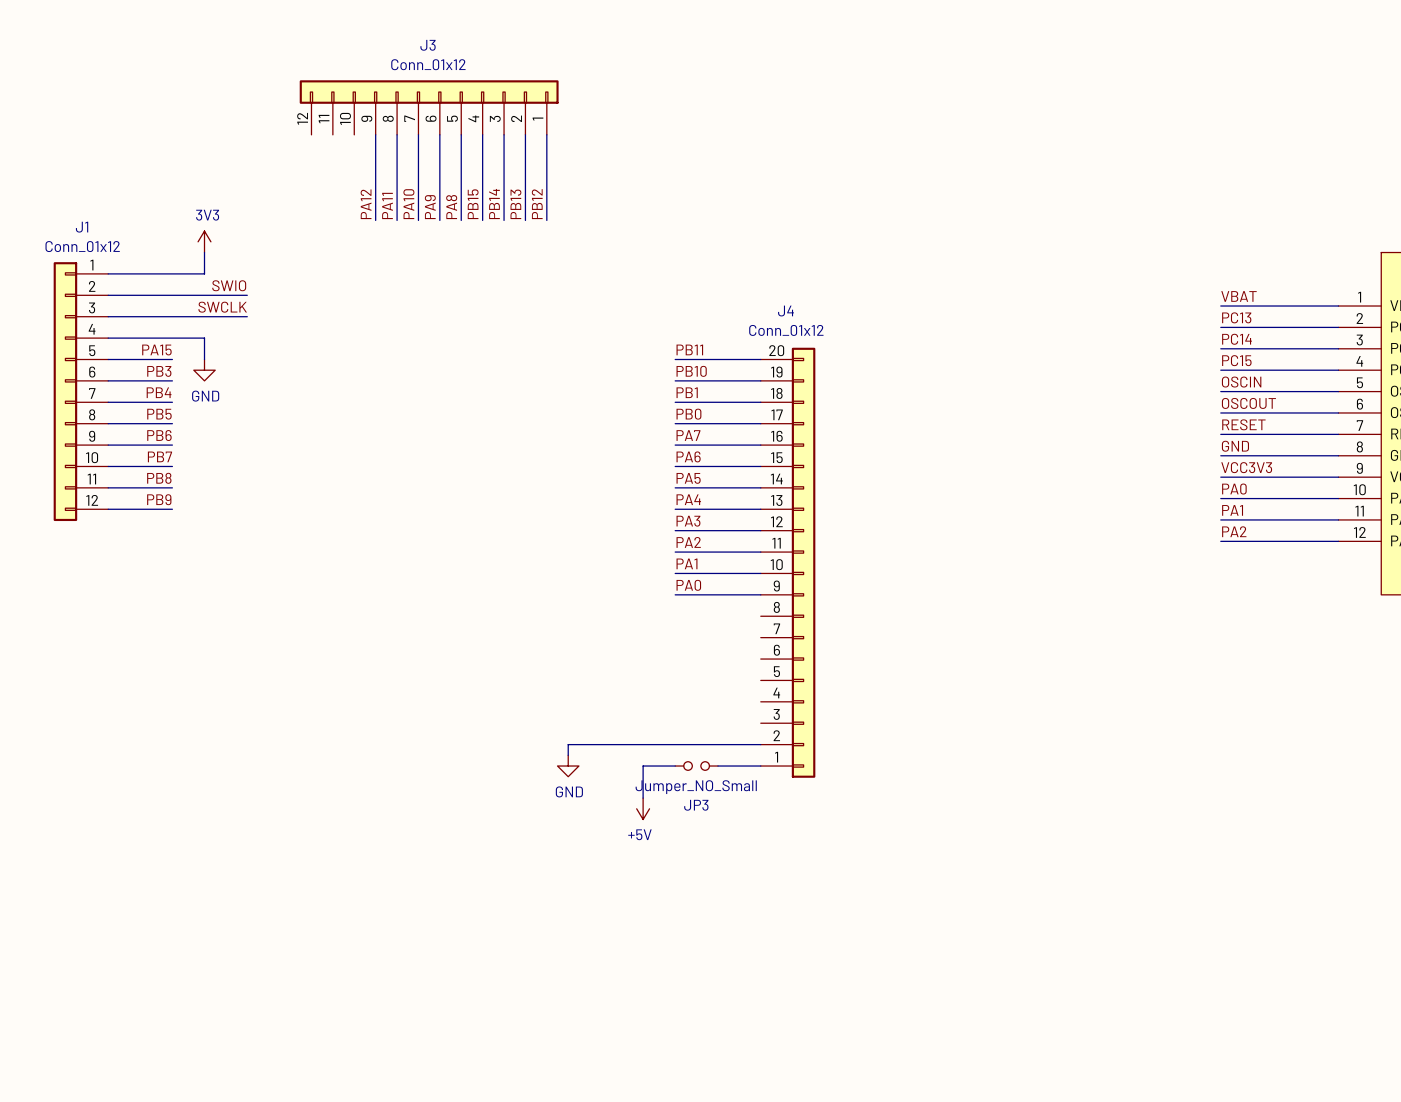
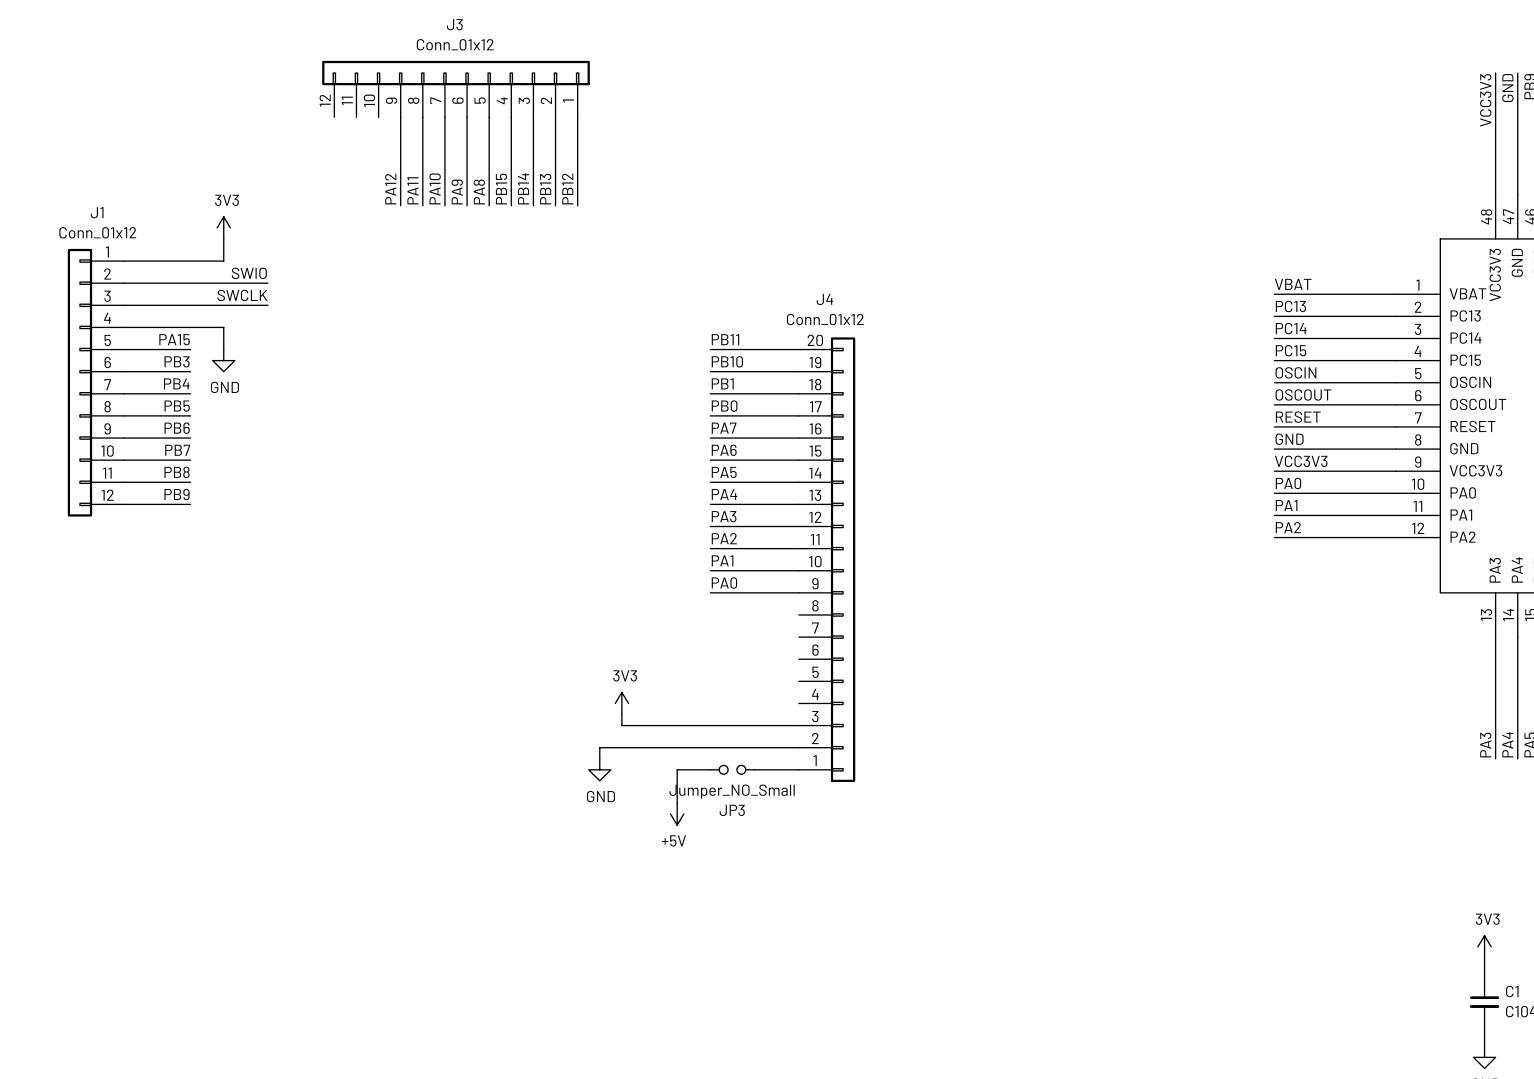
power symbol: none -> 3V3 (621, 703)
wire: none -> (621, 714) (621, 725) (798, 725)

